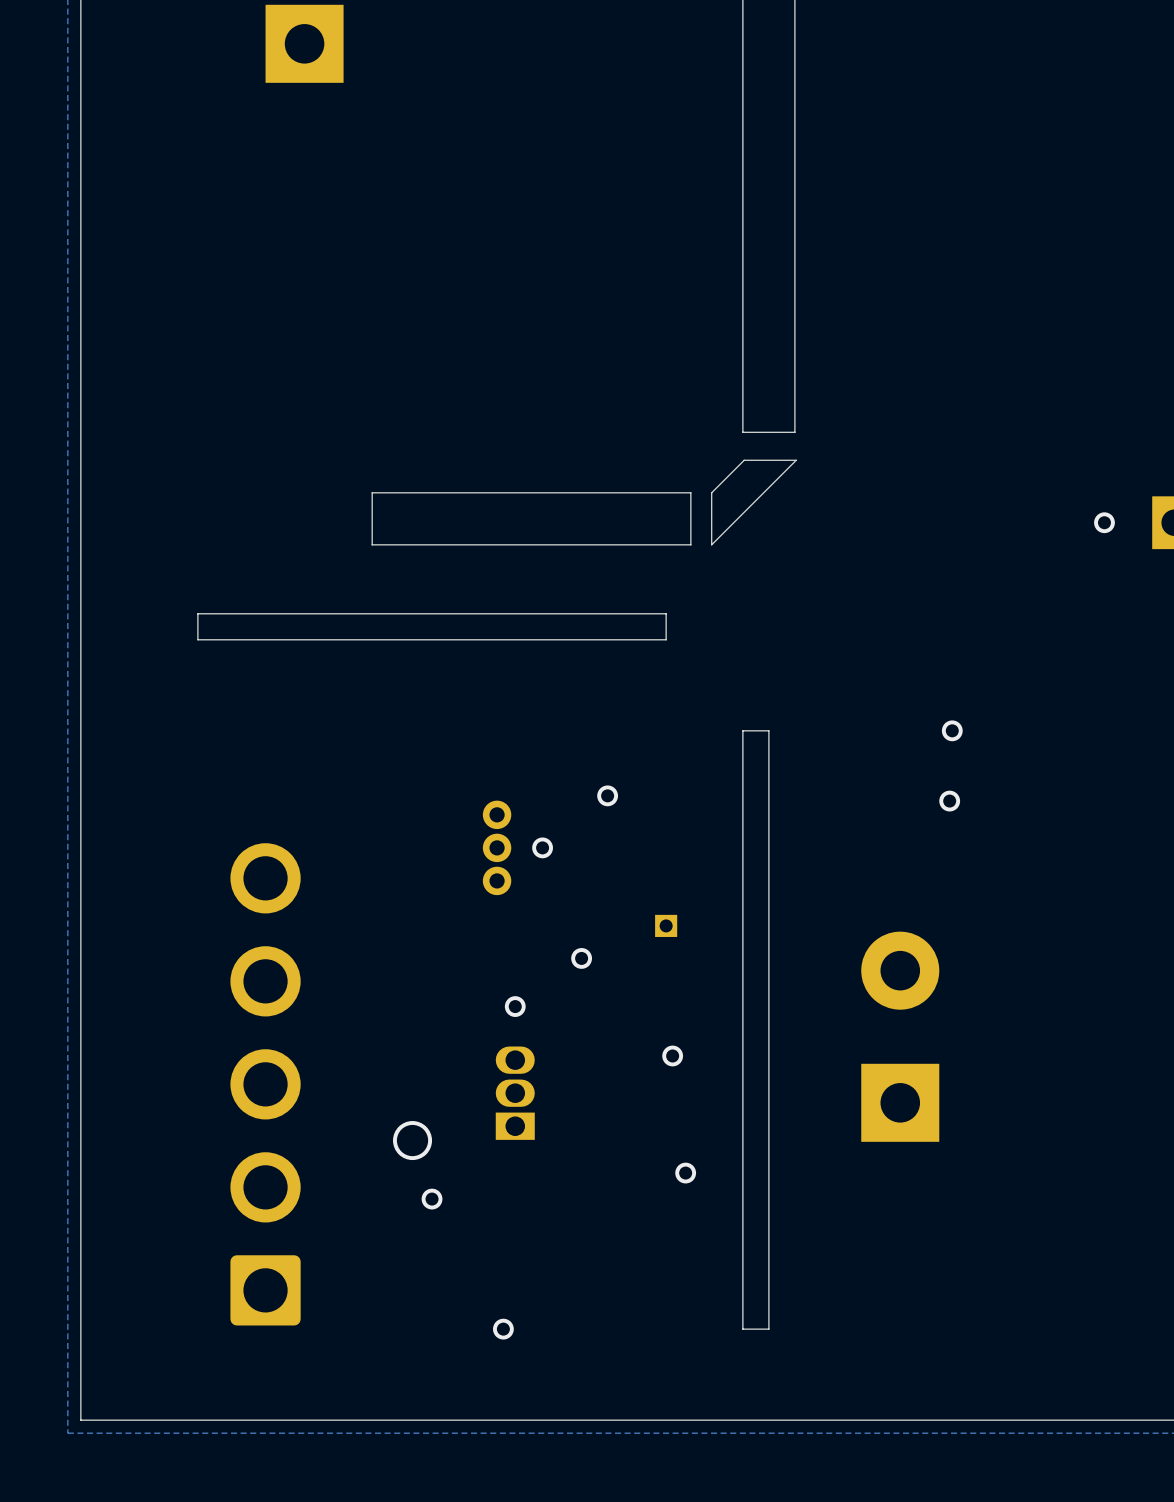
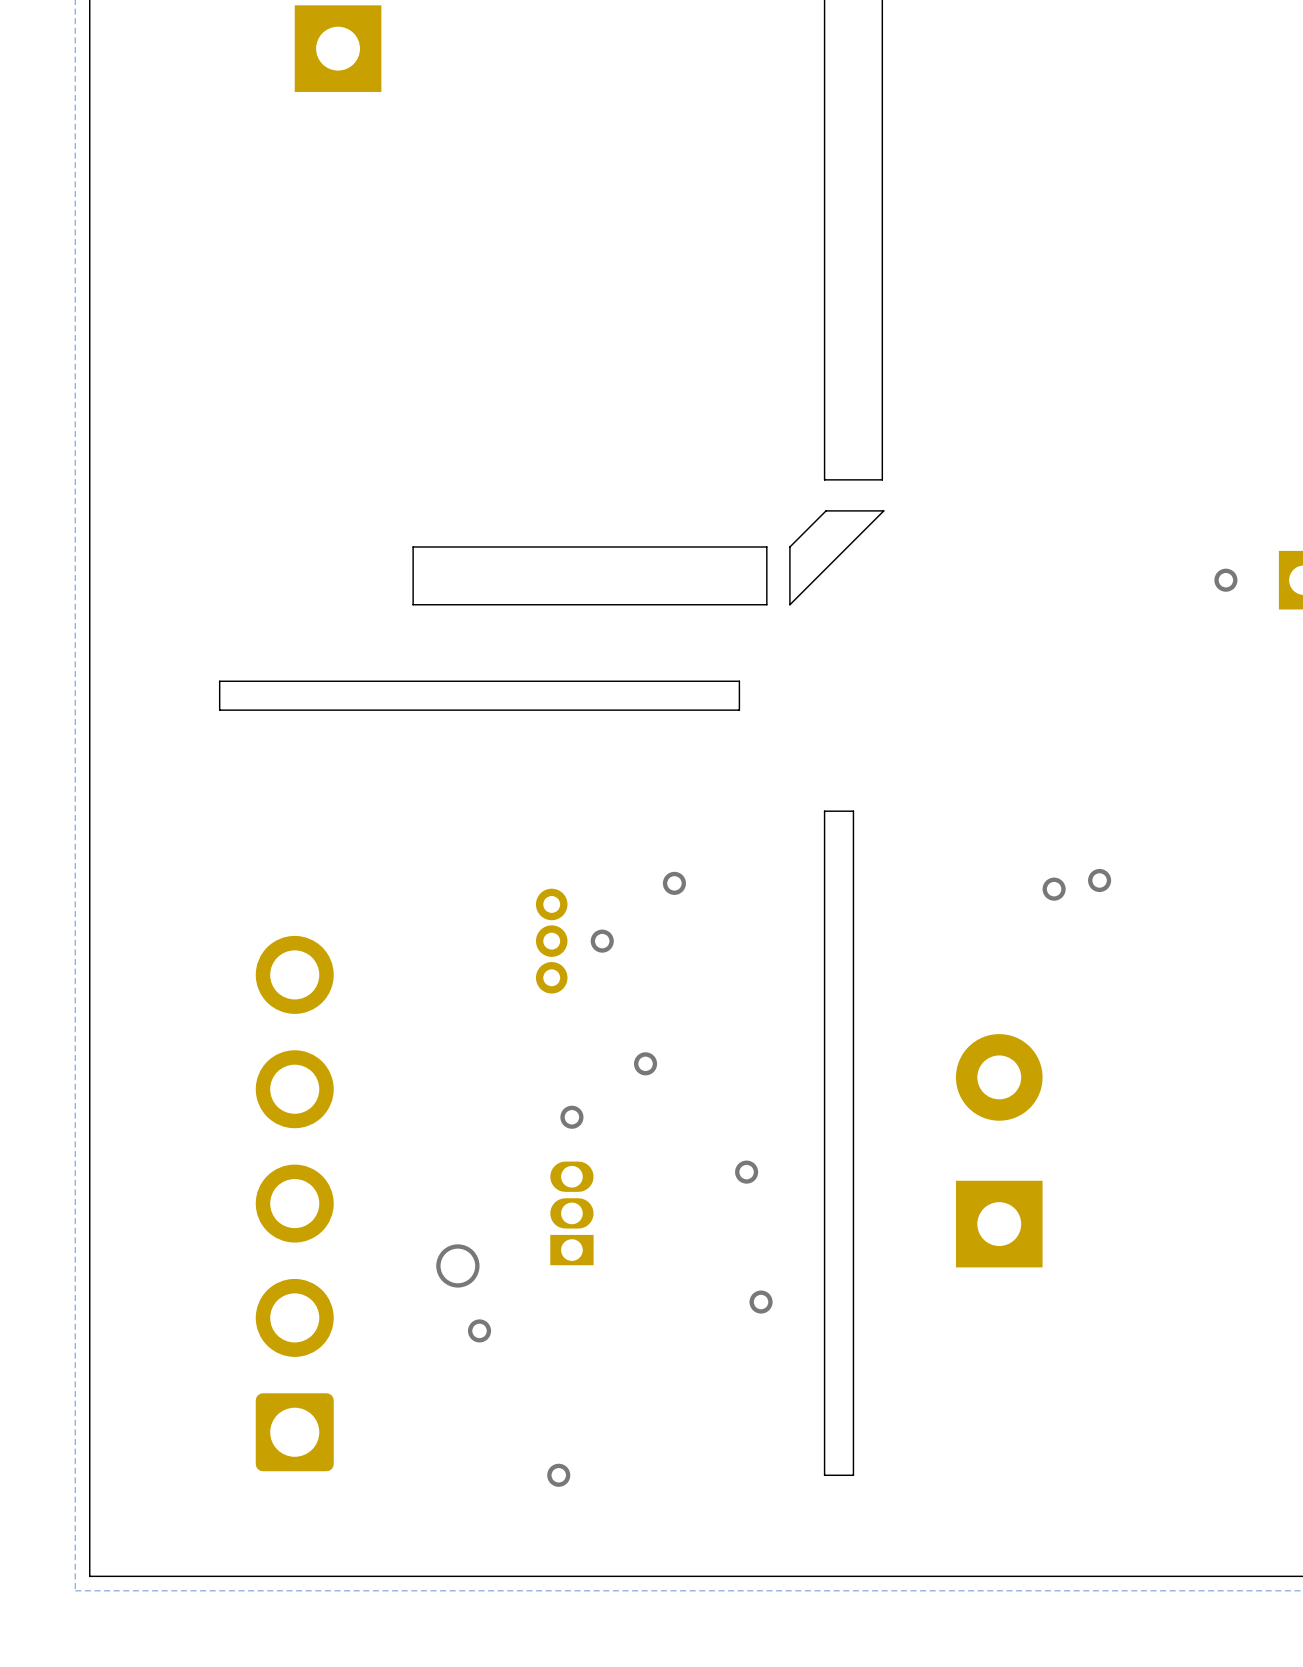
via position: (952, 730) -> (1099, 880)
part: (666, 925) -> none

